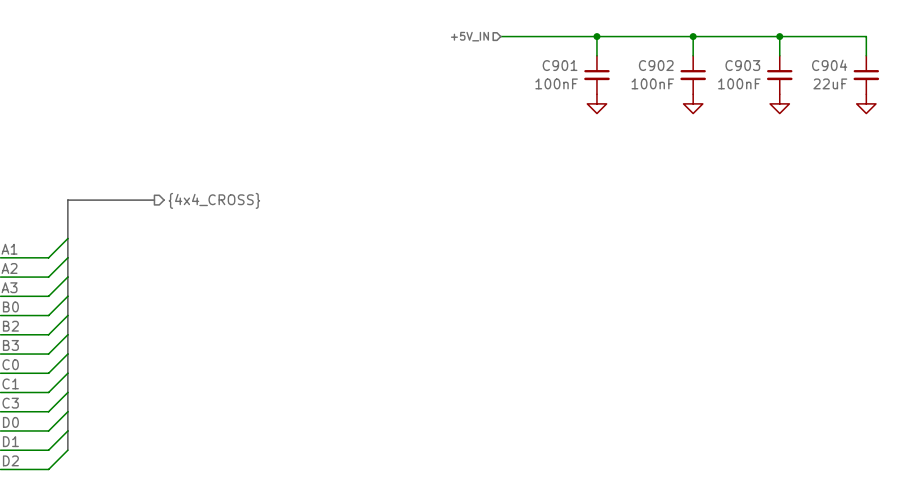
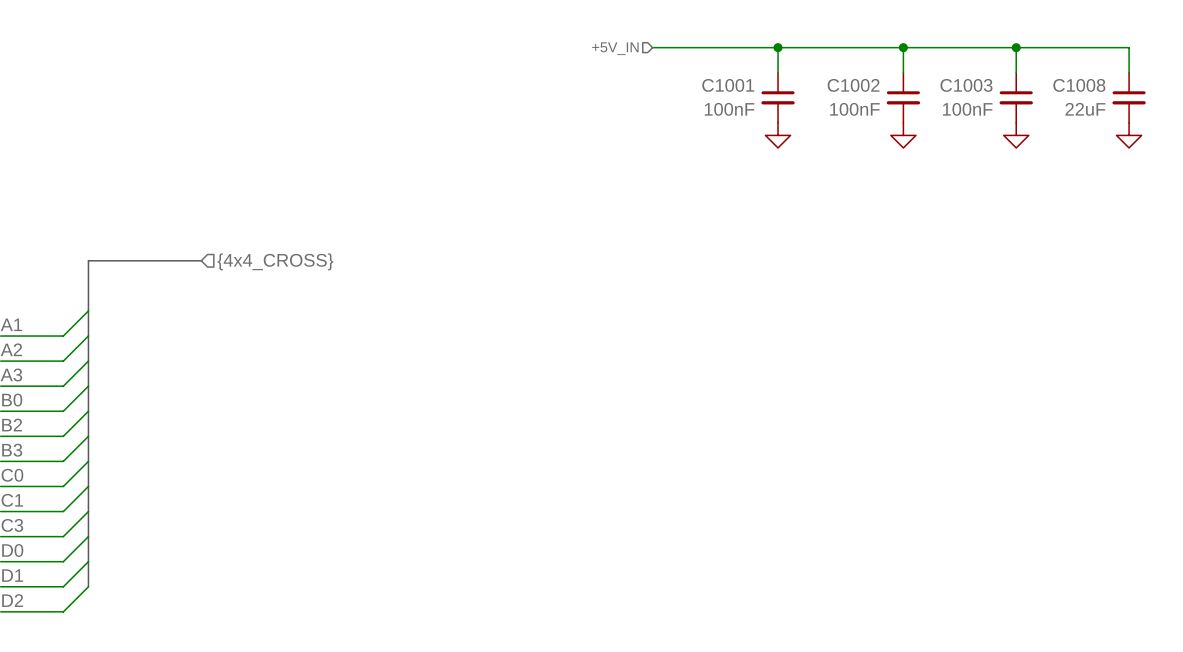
C901 name: C901 (560, 65) -> C1001 (728, 85)
C902 name: C902 (656, 65) -> C1002 (853, 85)
C903 name: C903 (742, 65) -> C1003 (966, 85)
C904 name: C904 (829, 65) -> C1008 (1079, 85)
hierarchical label shape: output (214, 200) -> input (275, 261)

